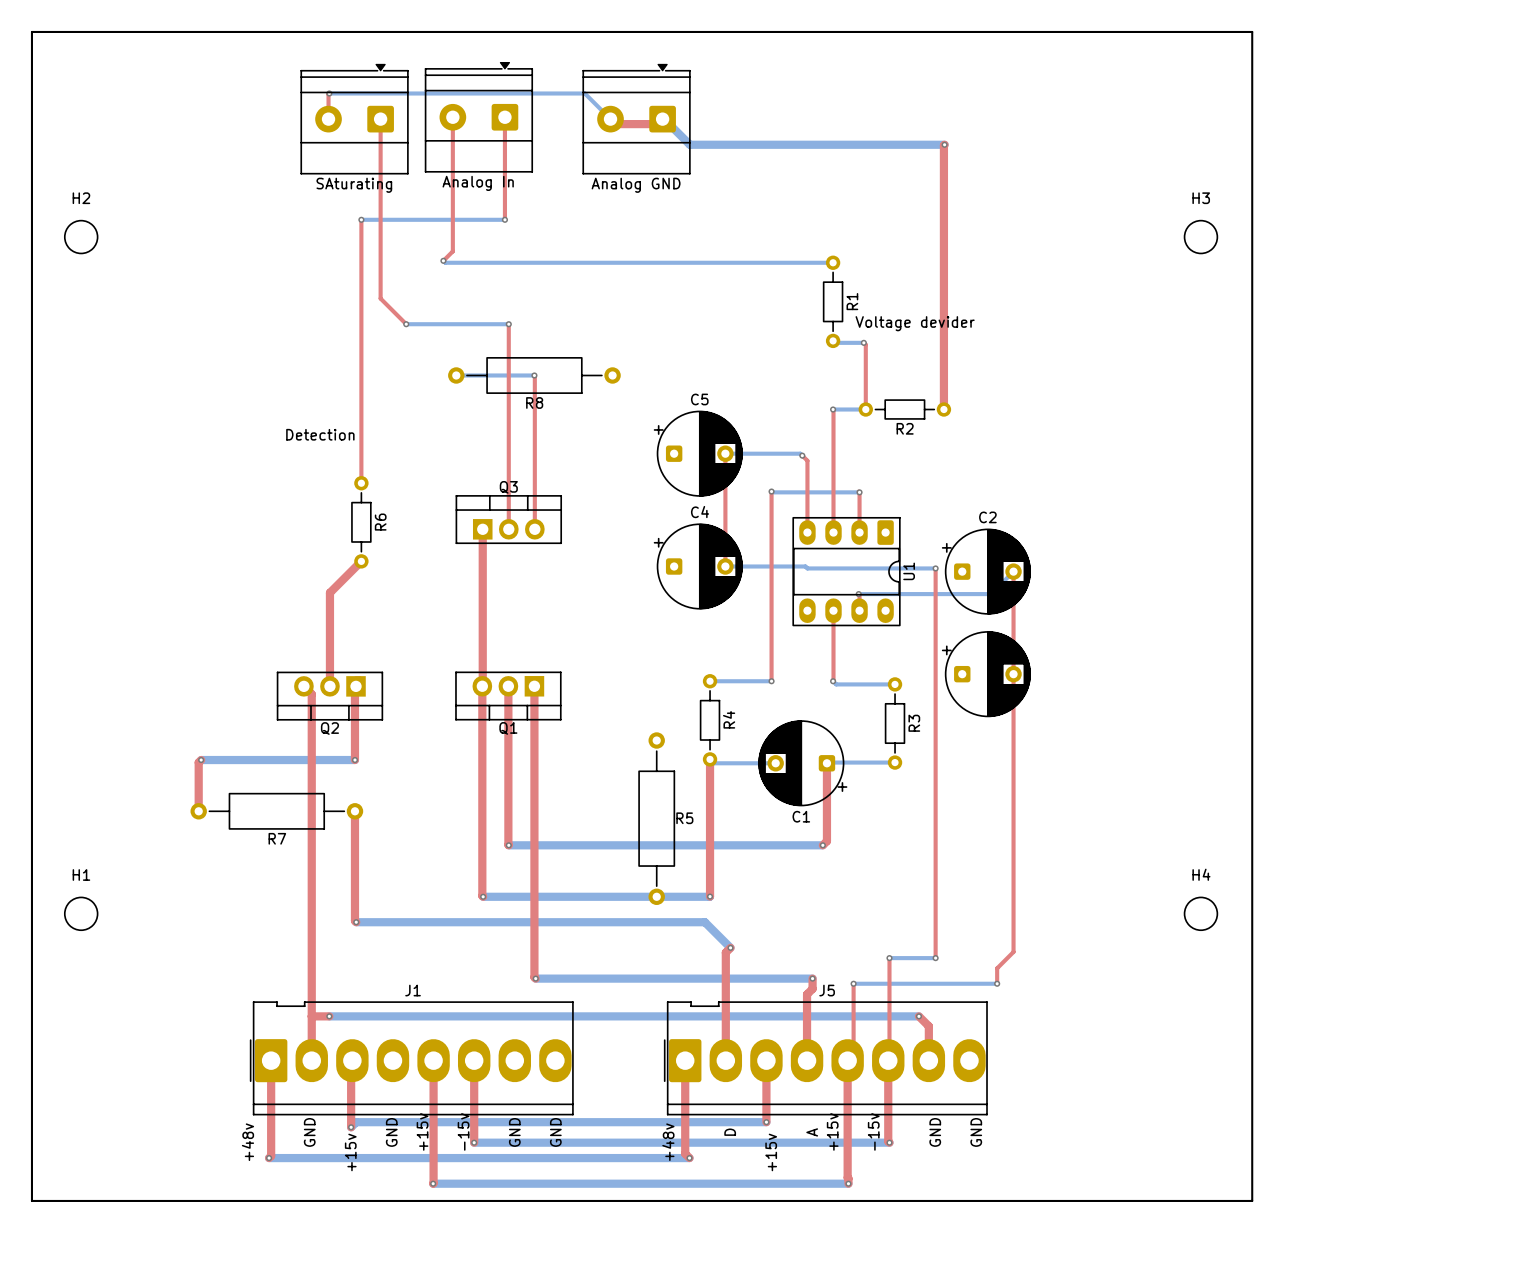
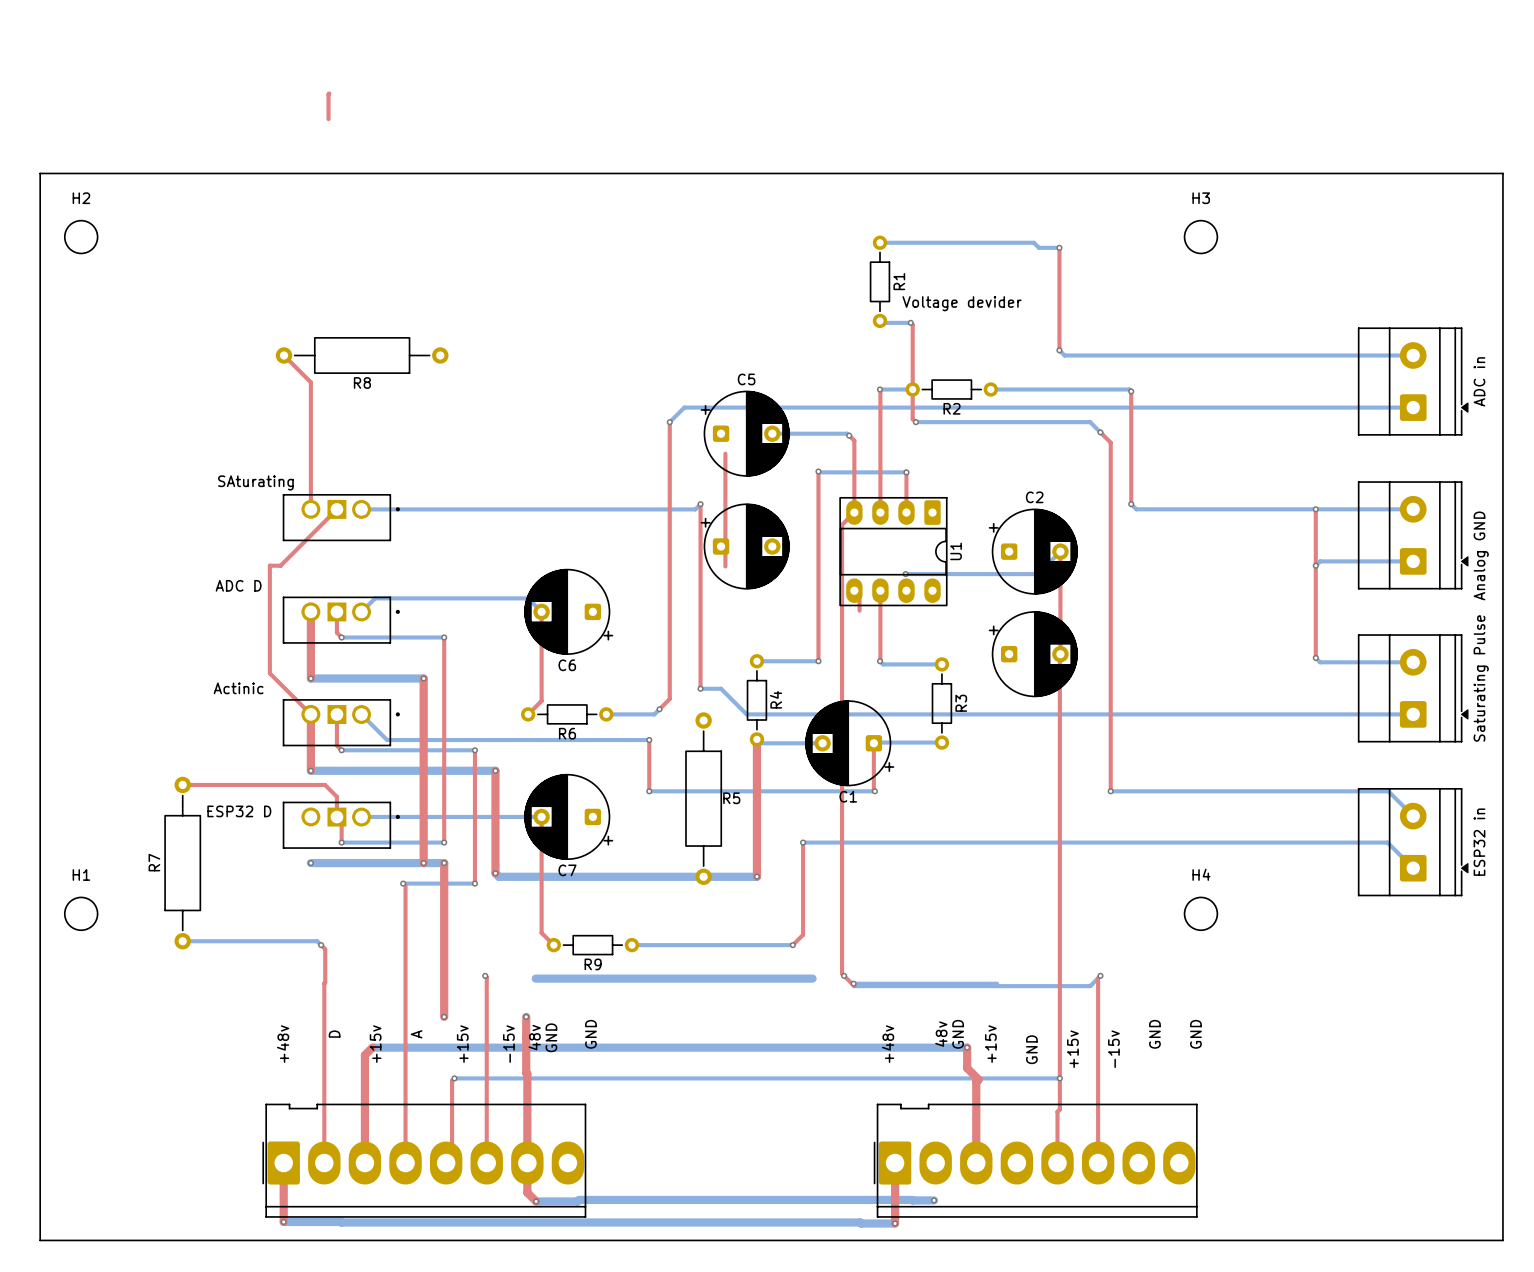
board edge: (31, 31) (1252, 31) (1252, 1200) (31, 1200) (31, 31) -> (40, 173) (40, 1240) (1502, 1240) (1502, 173) (40, 173)
bottom track: (329, 93) (584, 93) (610, 119) -> none
via: (329, 93) -> none
top track: (452, 117) (452, 251) (443, 260) -> none
Analog In: (478, 117) -> none
top track: (504, 117) (504, 219) -> none
SAturating: (354, 119) -> none
top track: (380, 119) (380, 298) (406, 324) -> none
Analog GND: (636, 119) -> none
top track: (617, 124) (669, 124) -> none
bottom track: (669, 124) (689, 144) (944, 144) -> none
top track: (944, 144) (943, 409) -> none
via: (944, 144) -> none
top track: (361, 219) (361, 486) -> none
bottom track: (361, 219) (504, 219) -> none
via: (361, 219) -> none
via: (504, 219) -> none
bottom track: none -> (880, 242) (1033, 242) (1038, 247) (1059, 247)
top track: none -> (1059, 247) (1059, 350)
via: none -> (1059, 247)
bottom track: (443, 260) (445, 262) (833, 262) -> none
via: (443, 260) -> none
R1 position: (833, 301) -> (880, 281)
top track: none -> (910, 322) (912, 324) (912, 418) (915, 422)
via: none -> (910, 322)
text position: Voltage devider (915, 323) -> Voltage devider (962, 303)
bottom track: (406, 324) (508, 324) -> none
via: (406, 324) -> none
top track: (508, 324) (508, 529) -> none
via: (508, 324) -> none
bottom track: (833, 340) (835, 342) (863, 342) -> (880, 320) (881, 322) (910, 322)
top track: (863, 342) (865, 344) (865, 409) -> none
via: (863, 342) -> none
bottom track: none -> (1059, 350) (1064, 355) (1413, 355)
via: none -> (1059, 350)
top track: none -> (284, 355) (310, 382) (310, 509)
bottom track: (456, 375) (534, 375) -> none
top track: (534, 375) (534, 529) -> none
R8 position: (534, 375) -> (362, 355)
via: (534, 375) -> none
part: none -> ADC in (1413, 381)
via: none -> (880, 389)
bottom track: none -> (990, 389) (1129, 389) (1131, 391)
top track: none -> (1131, 391) (1131, 504)
via: none -> (1131, 391)
bottom track: none -> (1413, 407) (684, 407) (669, 422)
top track: (833, 409) (833, 532) -> (880, 389) (880, 512)
bottom track: (833, 409) (865, 409) -> (880, 389) (912, 389)
via: (833, 409) -> none
R2 position: (904, 409) -> (951, 389)
top track: none -> (669, 422) (669, 699) (659, 709)
via: none -> (669, 422)
bottom track: none -> (915, 422) (1090, 422) (1100, 432)
via: none -> (915, 422)
top track: none -> (1100, 432) (1110, 442) (1110, 791)
via: none -> (1100, 432)
text: Detection (320, 434) -> none
top track: none -> (849, 435) (854, 440) (854, 512) (842, 524) (842, 973) (854, 986)
via: none -> (849, 435)
C5 position: (698, 453) -> (745, 433)
bottom track: (725, 453) (800, 453) (802, 455) -> (772, 433) (847, 433) (849, 435)
top track: (802, 455) (807, 460) (807, 532) -> none
via position: (802, 455) -> (818, 471)
via: none -> (906, 472)
top track: (771, 491) (771, 681) -> (818, 471) (818, 661)
bottom track: (771, 491) (859, 492) -> (818, 471) (906, 472)
via: (771, 491) -> none
top track: (858, 491) (859, 532) -> (905, 471) (906, 512)
via: (859, 492) -> none
top track: none -> (700, 504) (700, 688)
bottom track: none -> (700, 504) (695, 509) (361, 509)
via: none -> (700, 504)
bottom track: none -> (1131, 504) (1136, 509) (1413, 509)
via: none -> (1131, 504)
top track: none -> (336, 509) (280, 565) (269, 565) (269, 673) (310, 714) (310, 770)
top track: none -> (1315, 509) (1315, 657)
via: none -> (1315, 509)
part: none -> SAturating (341, 517)
Q3: (508, 519) -> none
R6 rotation: 0° (361, 522) -> 90° clockwise (567, 714)
R6 position: (361, 522) -> (567, 714)
top track: (482, 529) (483, 896) -> none
part: none -> Analog GND (1413, 535)
part: none -> (745, 546)
top track: none -> (1060, 551) (1059, 1109) (1057, 1111) (1057, 1163)
top track: (361, 561) (329, 592) (329, 686) -> none
bottom track: none -> (1413, 561) (1320, 561) (1315, 565)
via: none -> (1315, 565)
C4: (698, 566) -> none
bottom track: (725, 566) (935, 568) -> none
top track: (935, 568) (935, 958) -> none
via: (935, 568) -> none
U1 position: (846, 571) -> (893, 551)
C2 position: (986, 571) -> (1033, 551)
top track: (1013, 571) (1013, 951) (997, 968) (997, 983) -> none
bottom track: (1013, 571) (991, 594) (858, 594) -> (1060, 551) (1037, 574) (905, 574)
via: none -> (905, 574)
via: (858, 594) -> none
top track: (833, 610) (833, 681) -> (880, 590) (880, 661)
top track: none -> (310, 611) (310, 678)
top track: none -> (336, 611) (336, 632) (341, 637)
top track: none -> (541, 611) (541, 700) (528, 714)
bottom track: none -> (541, 611) (528, 598) (375, 598) (361, 611)
C6: none -> (568, 611)
part: none -> ADC D (341, 620)
bottom track: none -> (341, 637) (444, 637)
via: none -> (341, 637)
top track: none -> (444, 637) (444, 842)
via: none -> (444, 637)
bottom track: none -> (1315, 657) (1320, 662) (1413, 662)
via: none -> (1315, 657)
via: none -> (880, 661)
part position: (986, 674) -> (1033, 654)
bottom track: none -> (310, 678) (423, 678)
via: none -> (310, 678)
top track: none -> (423, 678) (423, 863)
via: none -> (423, 678)
bottom track: (710, 681) (771, 681) -> (756, 661) (818, 661)
via: (771, 681) -> none
bottom track: (833, 681) (836, 684) (895, 684) -> (880, 661) (883, 664) (941, 664)
via position: (833, 681) -> (818, 661)
top track: (303, 686) (311, 694) (311, 1060) -> none
top track: (356, 686) (354, 760) -> none
top track: (508, 686) (508, 845) -> none
top track: (534, 686) (535, 978) -> none
bottom track: none -> (700, 688) (721, 688) (746, 714) (1413, 714)
via: none -> (700, 688)
part: none -> Saturating Pulse (1413, 688)
Q2: (329, 696) -> none
Q1: (508, 696) -> none
bottom track: none -> (659, 709) (654, 714) (606, 714)
via: none -> (659, 709)
top track: none -> (336, 714) (336, 745) (341, 750)
bottom track: none -> (361, 714) (387, 740) (649, 740)
R4 position: (710, 720) -> (756, 700)
part: none -> Actinic (341, 722)
R3 position: (895, 723) -> (941, 703)
top track: none -> (649, 740) (649, 791)
via: none -> (649, 740)
top track: none -> (874, 744) (874, 791)
bottom track: none -> (341, 750) (474, 750)
top track: none -> (474, 750) (474, 883)
via: none -> (474, 750)
top track: (710, 759) (710, 896) -> (756, 739) (756, 876)
bottom track: (710, 759) (713, 763) (775, 763) -> (756, 739) (760, 743) (822, 743)
top track: (201, 760) (198, 762) (198, 811) -> none
bottom track: (201, 760) (354, 760) -> none
via: (201, 760) -> none
via position: (354, 760) -> (341, 750)
bottom track: (895, 762) (826, 763) -> (941, 742) (873, 743)
C1 position: (802, 763) -> (849, 743)
top track: (827, 764) (826, 841) (822, 845) -> none
bottom track: none -> (310, 770) (495, 770)
via: none -> (310, 770)
top track: none -> (495, 770) (495, 873)
via: none -> (495, 770)
top track: none -> (182, 784) (325, 784) (336, 796) (336, 817) (341, 821) (341, 842)
bottom track: none -> (649, 791) (874, 791)
via: none -> (649, 791)
via: none -> (874, 791)
bottom track: none -> (1110, 791) (1388, 791) (1413, 816)
via: none -> (1110, 791)
R7 rotation: 0° (276, 811) -> 90° clockwise (182, 863)
R7 position: (276, 811) -> (182, 863)
top track: (354, 811) (356, 922) -> none
bottom track: none -> (361, 816) (541, 816)
top track: none -> (541, 816) (541, 932) (553, 945)
C7: none -> (568, 816)
R5 position: (656, 818) -> (703, 798)
part: none -> ESP32 D (341, 825)
bottom track: none -> (341, 842) (444, 842)
via: none -> (341, 842)
via: none -> (444, 842)
top track: none -> (803, 842) (803, 934) (792, 945)
bottom track: none -> (803, 842) (1387, 842) (1413, 868)
part: none -> ESP32 in (1413, 842)
bottom track: (508, 845) (822, 845) -> none
via: (508, 845) -> none
via position: (822, 845) -> (803, 842)
bottom track: none -> (310, 863) (444, 863)
via: none -> (310, 863)
via: none -> (423, 863)
top track: none -> (444, 863) (444, 1016)
via: none -> (444, 863)
bottom track: none -> (495, 873) (498, 876) (756, 876)
via: none -> (495, 873)
via: none -> (756, 876)
bottom track: none -> (403, 883) (474, 883)
via: none -> (403, 883)
via: none -> (474, 883)
top track: none -> (405, 885) (405, 1163)
via: (483, 896) -> none
bottom track: (710, 896) (483, 896) -> none
via: (710, 896) -> none
bottom track: (356, 922) (704, 922) (730, 947) -> none
via: (356, 922) -> none
bottom track: none -> (182, 941) (317, 941) (321, 945)
top track: none -> (321, 945) (325, 949) (324, 1163)
via: none -> (321, 945)
R9: none -> (592, 945)
bottom track: none -> (631, 945) (792, 945)
via: none -> (792, 945)
top track: (730, 947) (725, 952) (725, 1060) -> none
via: (730, 947) -> none
top track: (889, 958) (889, 1142) -> none
bottom track: (889, 958) (935, 958) -> none
via: (889, 958) -> none
via: (935, 958) -> none
top track: none -> (485, 975) (486, 977) (486, 1163) (487, 1161)
via: none -> (485, 975)
via: none -> (844, 975)
top track: none -> (1100, 975) (1098, 978) (1098, 1163)
bottom track: none -> (1100, 975) (1090, 986) (854, 986)
via: none -> (1100, 975)
via: (535, 978) -> none
top track: (812, 978) (812, 988) (807, 994) (807, 1060) -> none
via: (812, 978) -> none
top track: (853, 983) (853, 1054) (847, 1060) (848, 1183) -> none
via: (997, 983) -> none
top track: (311, 1016) (329, 1016) -> none
bottom track: (329, 1016) (918, 1016) -> none
via: (329, 1016) -> none
via: none -> (444, 1016)
top track: none -> (526, 1016) (527, 1192) (536, 1201)
via: none -> (526, 1016)
top track: (918, 1016) (928, 1026) (928, 1060) -> none
via: (918, 1016) -> none
text: none -> D (334, 1034)
text: none -> A (416, 1034)
text: none -> GND (590, 1034)
text: none -> 48v (941, 1034)
text: none -> GND (958, 1034)
text: none -> GND (1154, 1034)
text: none -> GND (1195, 1034)
text: none -> 48v (534, 1037)
text: none -> GND (551, 1037)
text: none -> +15v (375, 1044)
text: none -> +15v (462, 1044)
text: none -> +48v (888, 1044)
text: none -> +15v (990, 1044)
top track: none -> (372, 1047) (364, 1055) (364, 1163)
bottom track: none -> (372, 1047) (967, 1047)
top track: none -> (967, 1047) (967, 1068) (978, 1079) (976, 1082) (975, 1164)
via: none -> (967, 1047)
text: none -> GND (1031, 1049)
text: none -> +15v (1072, 1049)
text: none -> -15v (1113, 1049)
J1: (411, 1058) -> none
J5: (825, 1058) -> none
top track: (271, 1060) (271, 1156) (269, 1158) -> none
top track: (352, 1060) (351, 1127) -> none
top track: (433, 1060) (433, 1183) -> none
top track: (474, 1060) (474, 1142) -> none
top track: (685, 1060) (685, 1153) (689, 1158) -> none
top track: (766, 1060) (766, 1122) -> none
top track: none -> (454, 1078) (452, 1080) (452, 1157) (446, 1163)
bottom track: none -> (454, 1078) (1059, 1078)
via: none -> (454, 1078)
via: none -> (1059, 1078)
bottom track: (766, 1122) (356, 1122) (351, 1127) -> none
via: (766, 1122) -> none
via: (351, 1127) -> none
text: +15v (422, 1131) -> none
text position: -15v (463, 1131) -> -15v (508, 1044)
text: +15v (832, 1131) -> none
text: -15v (873, 1131) -> none
text: GND (309, 1132) -> none
text: GND (391, 1132) -> none
text: GND (514, 1132) -> none
text: GND (555, 1132) -> none
text: D (730, 1132) -> none
text: A (812, 1132) -> none
text: GND (935, 1132) -> none
text: GND (976, 1132) -> none
text position: +48v (247, 1142) -> +48v (283, 1044)
bottom track: (474, 1142) (889, 1142) -> none
via: (474, 1142) -> none
text: +48v (668, 1142) -> none
via: (889, 1142) -> none
text: +15v (350, 1152) -> none
text: +15v (771, 1152) -> none
bottom track: (269, 1158) (689, 1158) -> none
via: (269, 1158) -> none
via: (689, 1158) -> none
part: none -> (424, 1160)
part: none -> (1035, 1160)
top track: none -> (283, 1163) (283, 1221)
top track: none -> (895, 1163) (895, 1223)
bottom track: (433, 1183) (848, 1183) -> none
via: (433, 1183) -> none
via: (848, 1183) -> none
bottom track: none -> (934, 1200) (536, 1201)
via: none -> (934, 1200)
via: none -> (536, 1201)
bottom track: none -> (283, 1221) (895, 1223)
via: none -> (283, 1221)
via: none -> (895, 1223)

